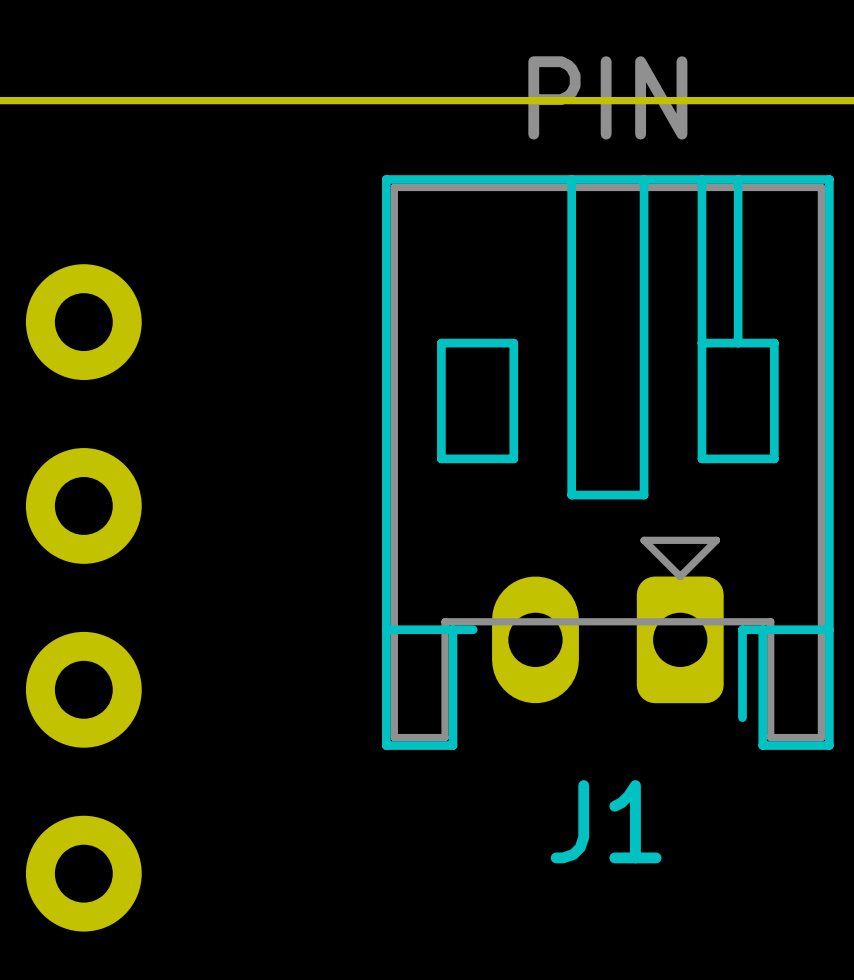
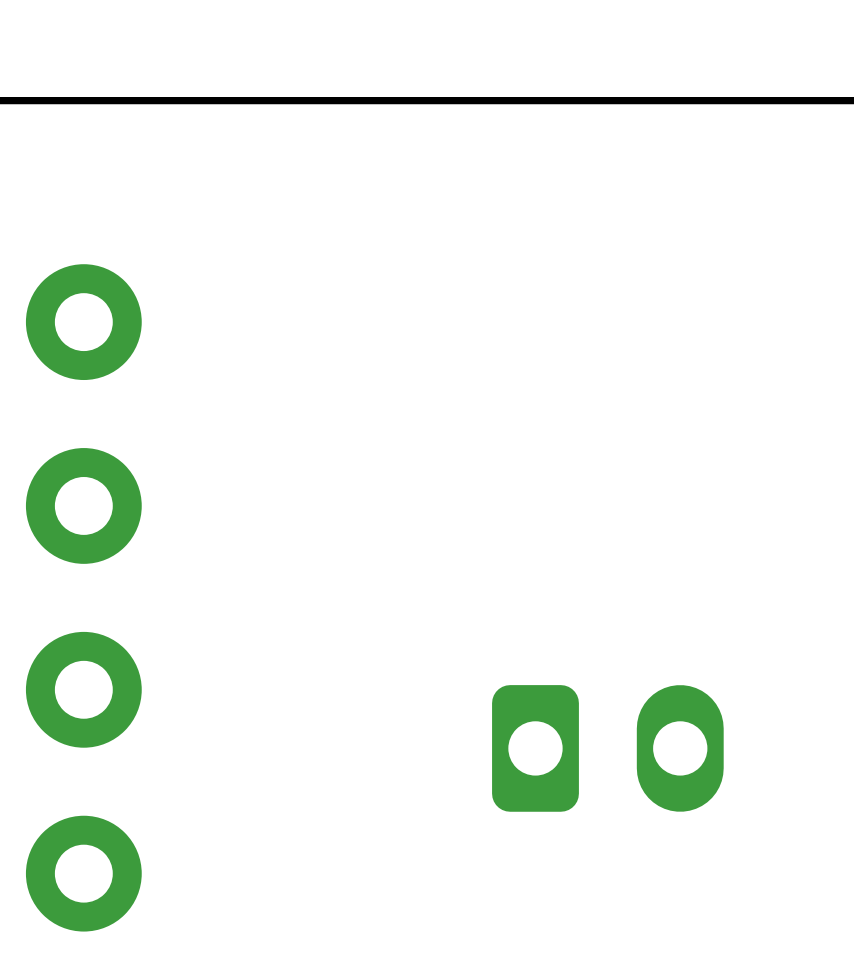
J1 side: bottom (607, 462) -> top (607, 748)

